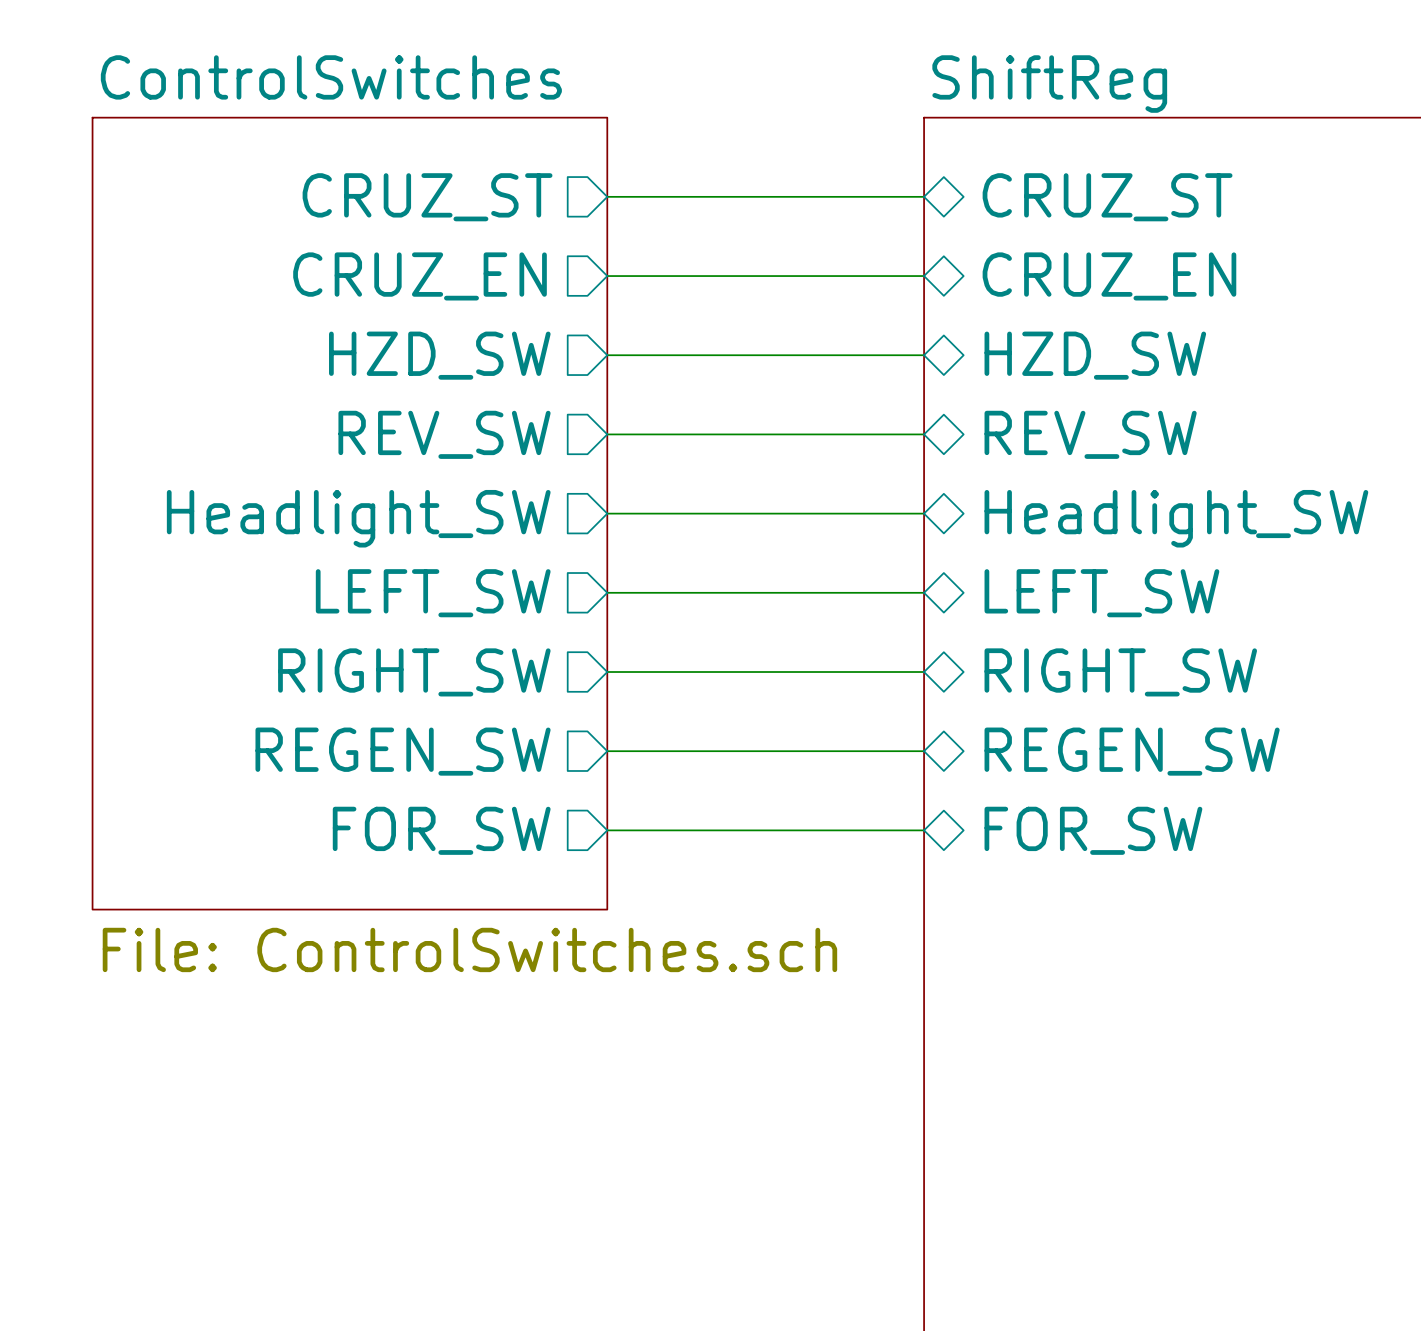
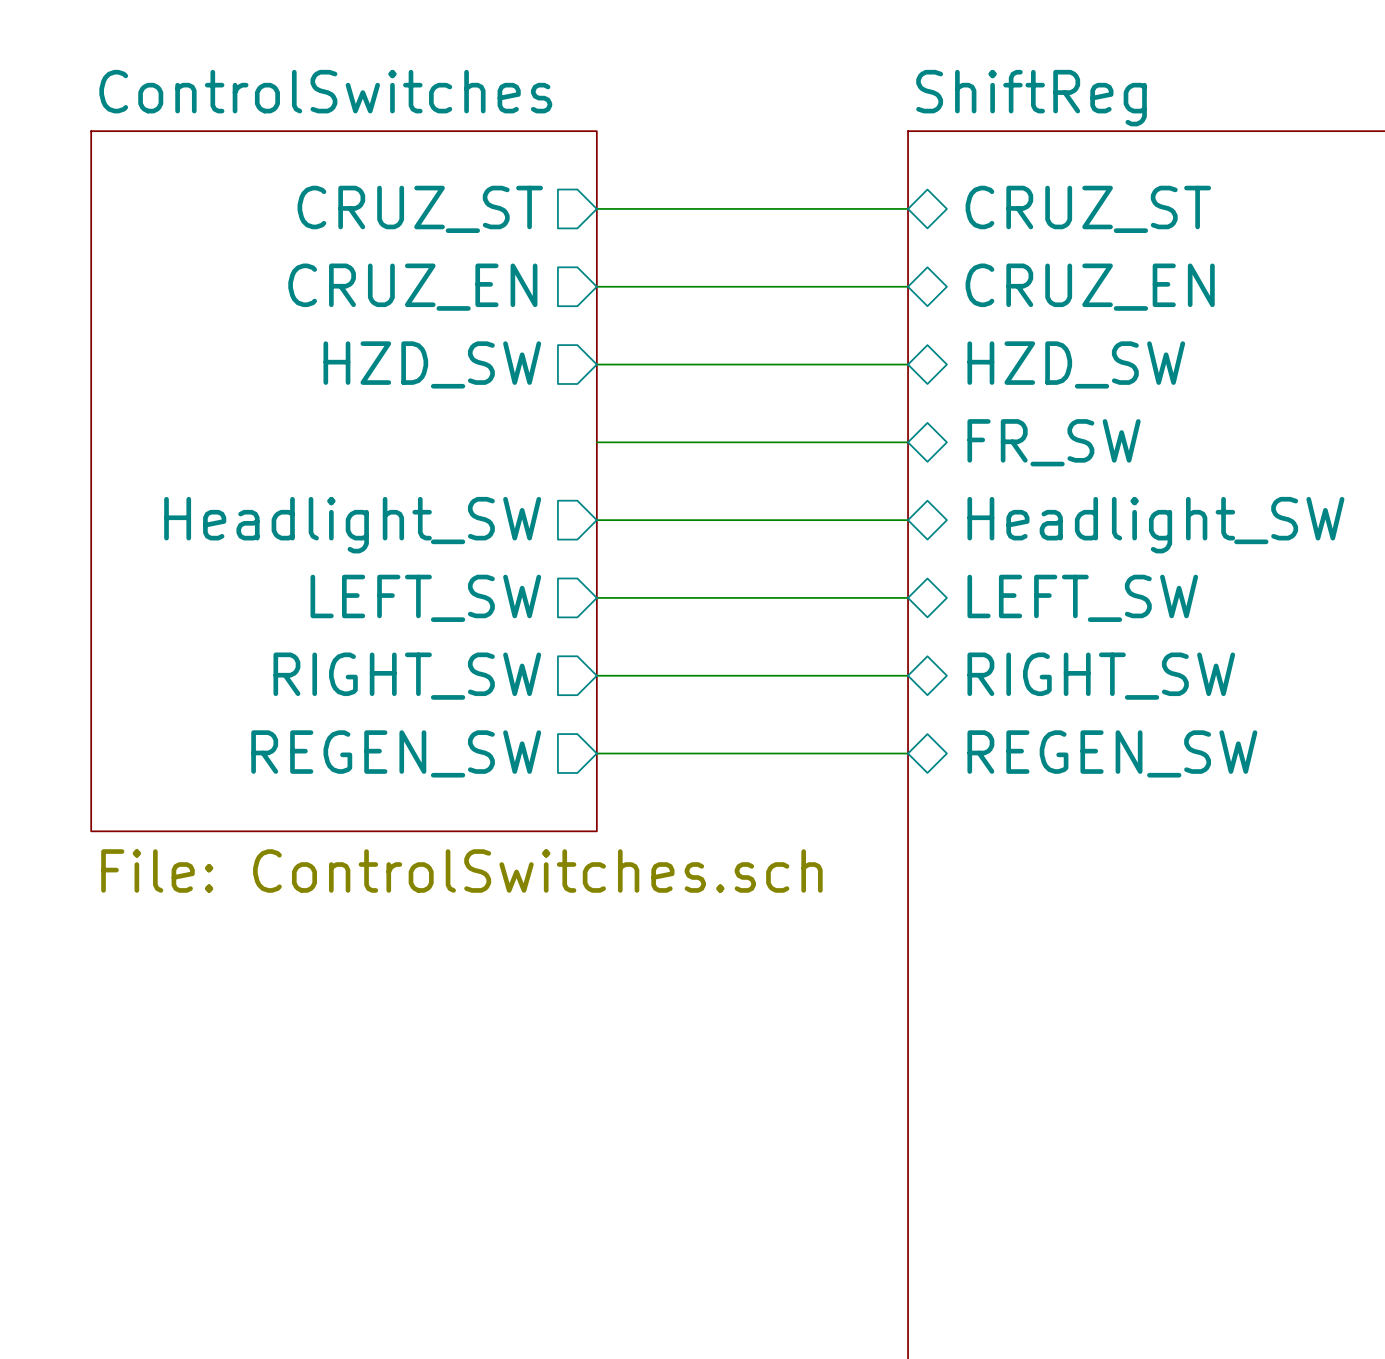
sheet pin: REV_SW (444, 434) -> none
sheet pin: REV_SW (1090, 434) -> FR_SW (1054, 442)
sheet ControlSwitches: none -> File: ControlSwitches.sch (344, 481)
sheet ControlSwitches: File: ControlSwitches.sch (349, 513) -> none
sheet pin: FOR_SW (441, 830) -> none
wire: (607, 830) (924, 830) -> none
sheet pin: FOR_SW (1093, 830) -> none

